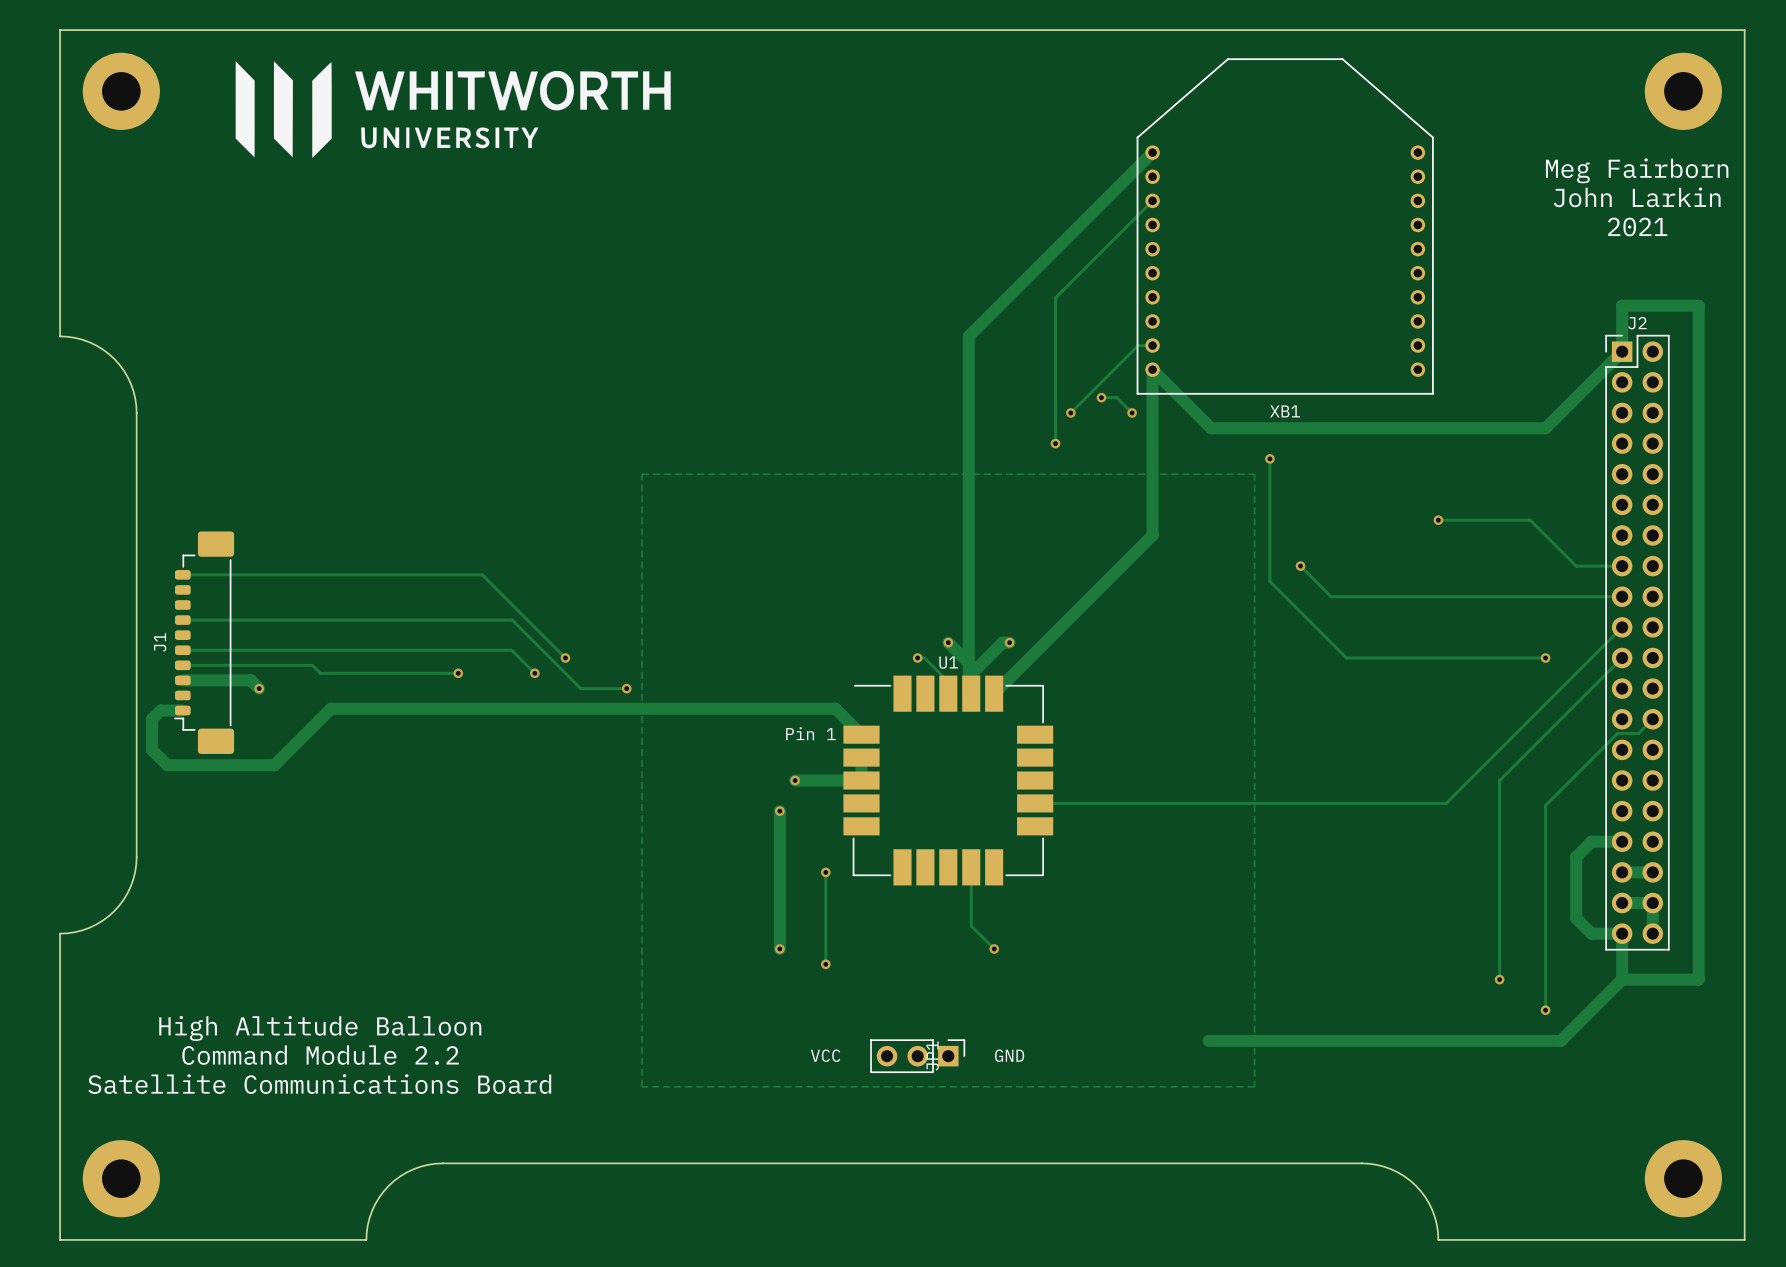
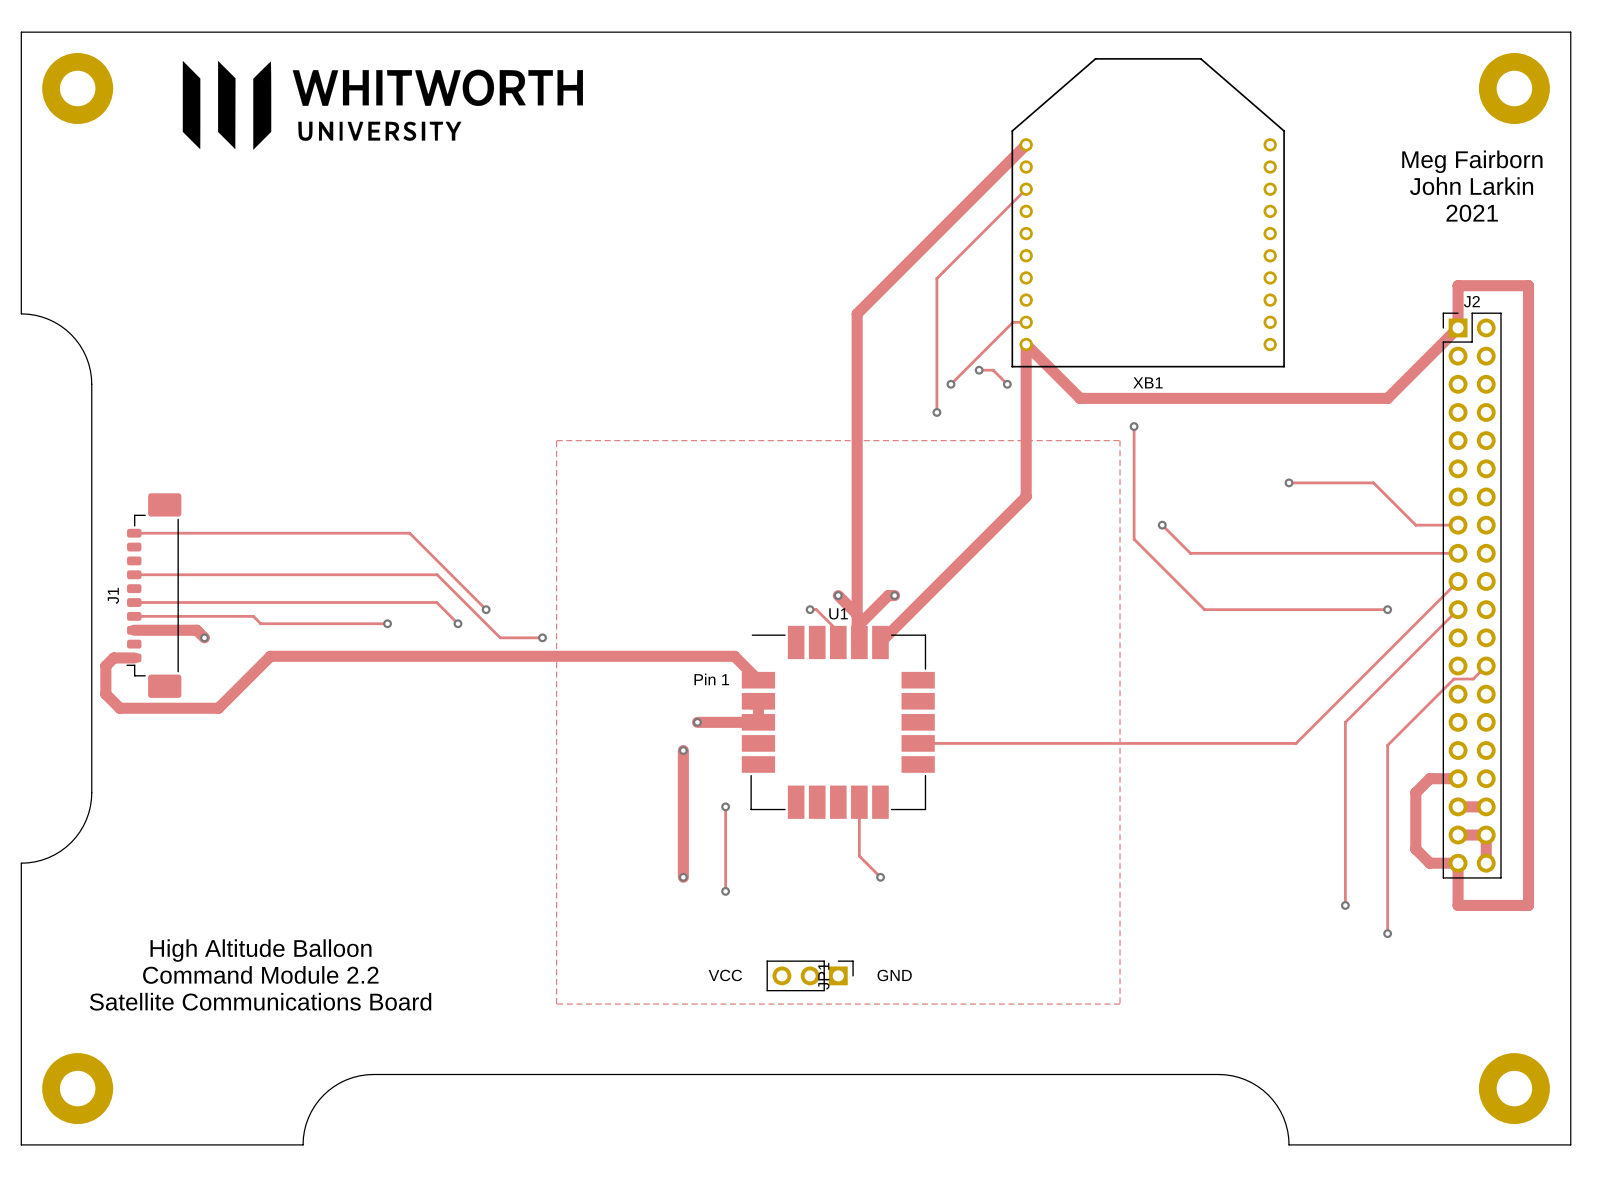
track: (1622, 979) (1560, 1040) (1208, 1040) -> none

